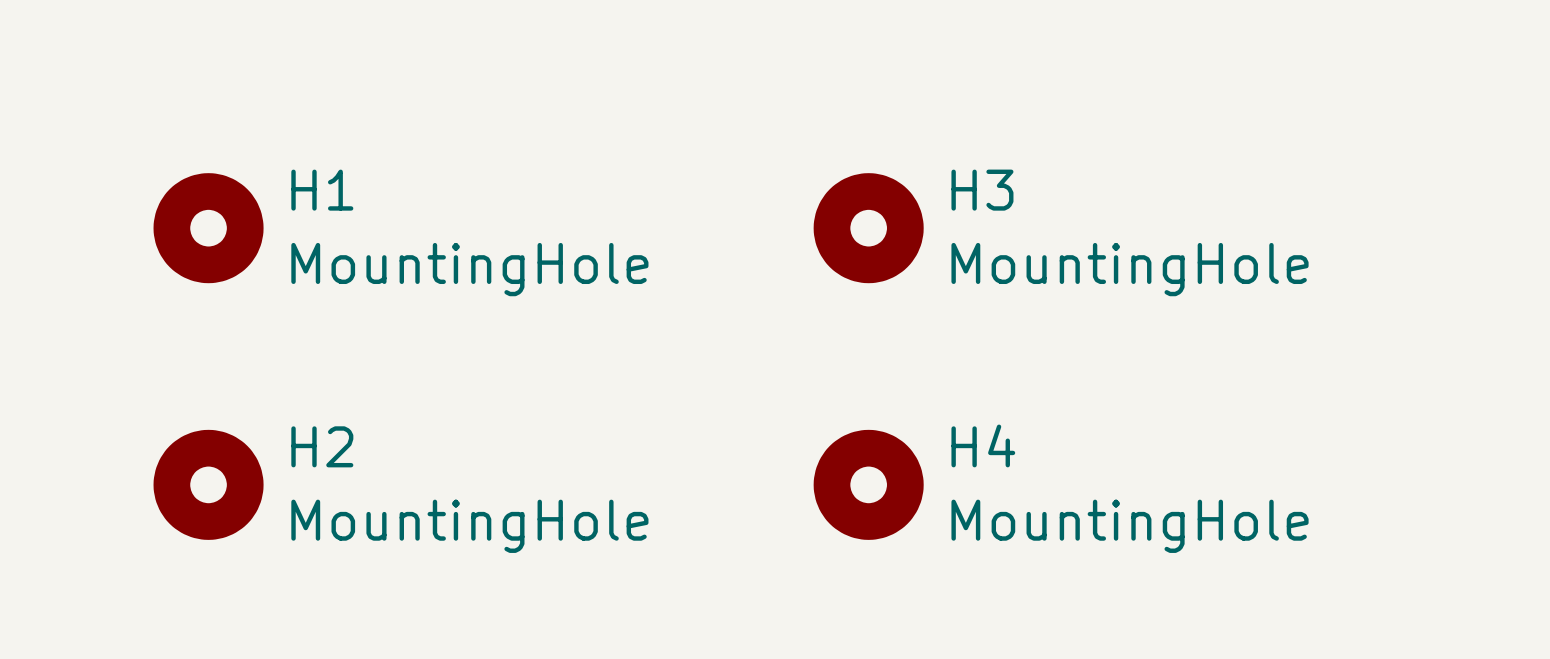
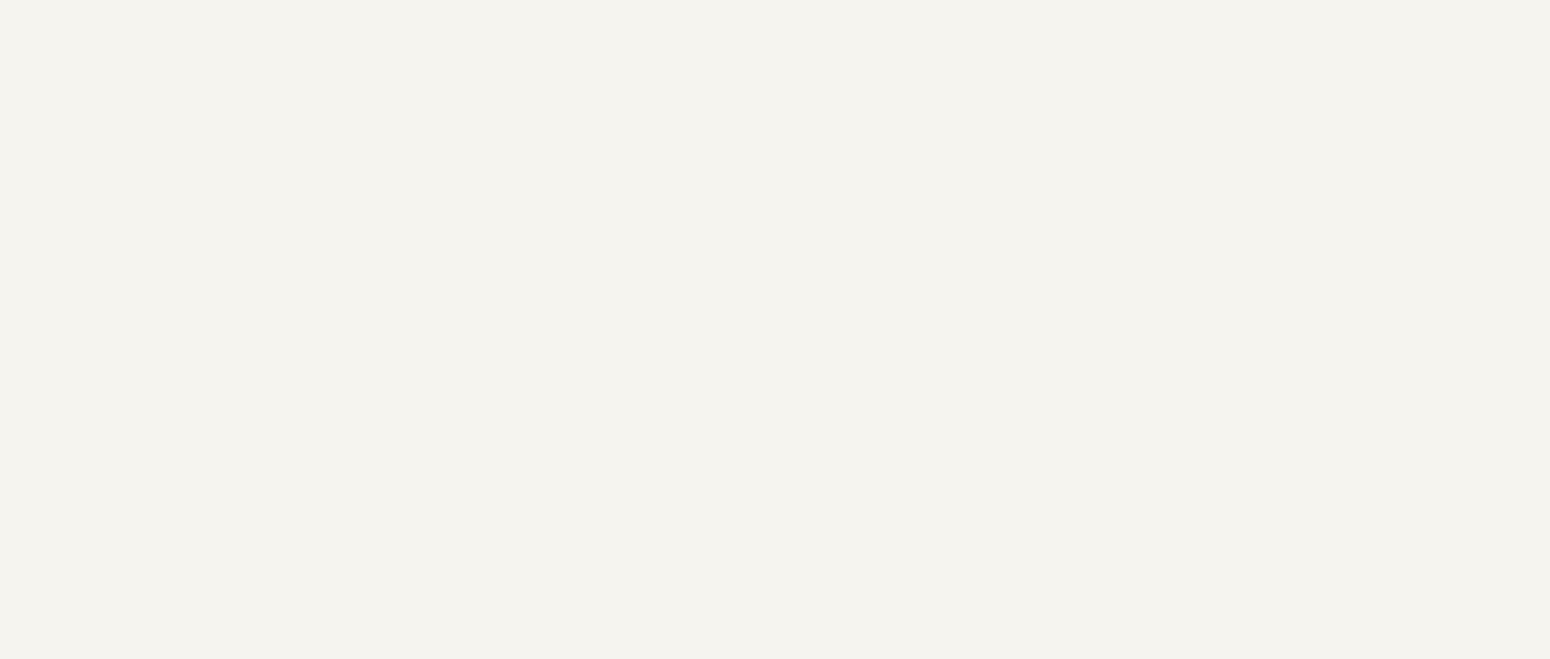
H1: MountingHole (208, 228) -> none
H3: MountingHole (868, 228) -> none
H2: MountingHole (208, 484) -> none
H4: MountingHole (868, 484) -> none

